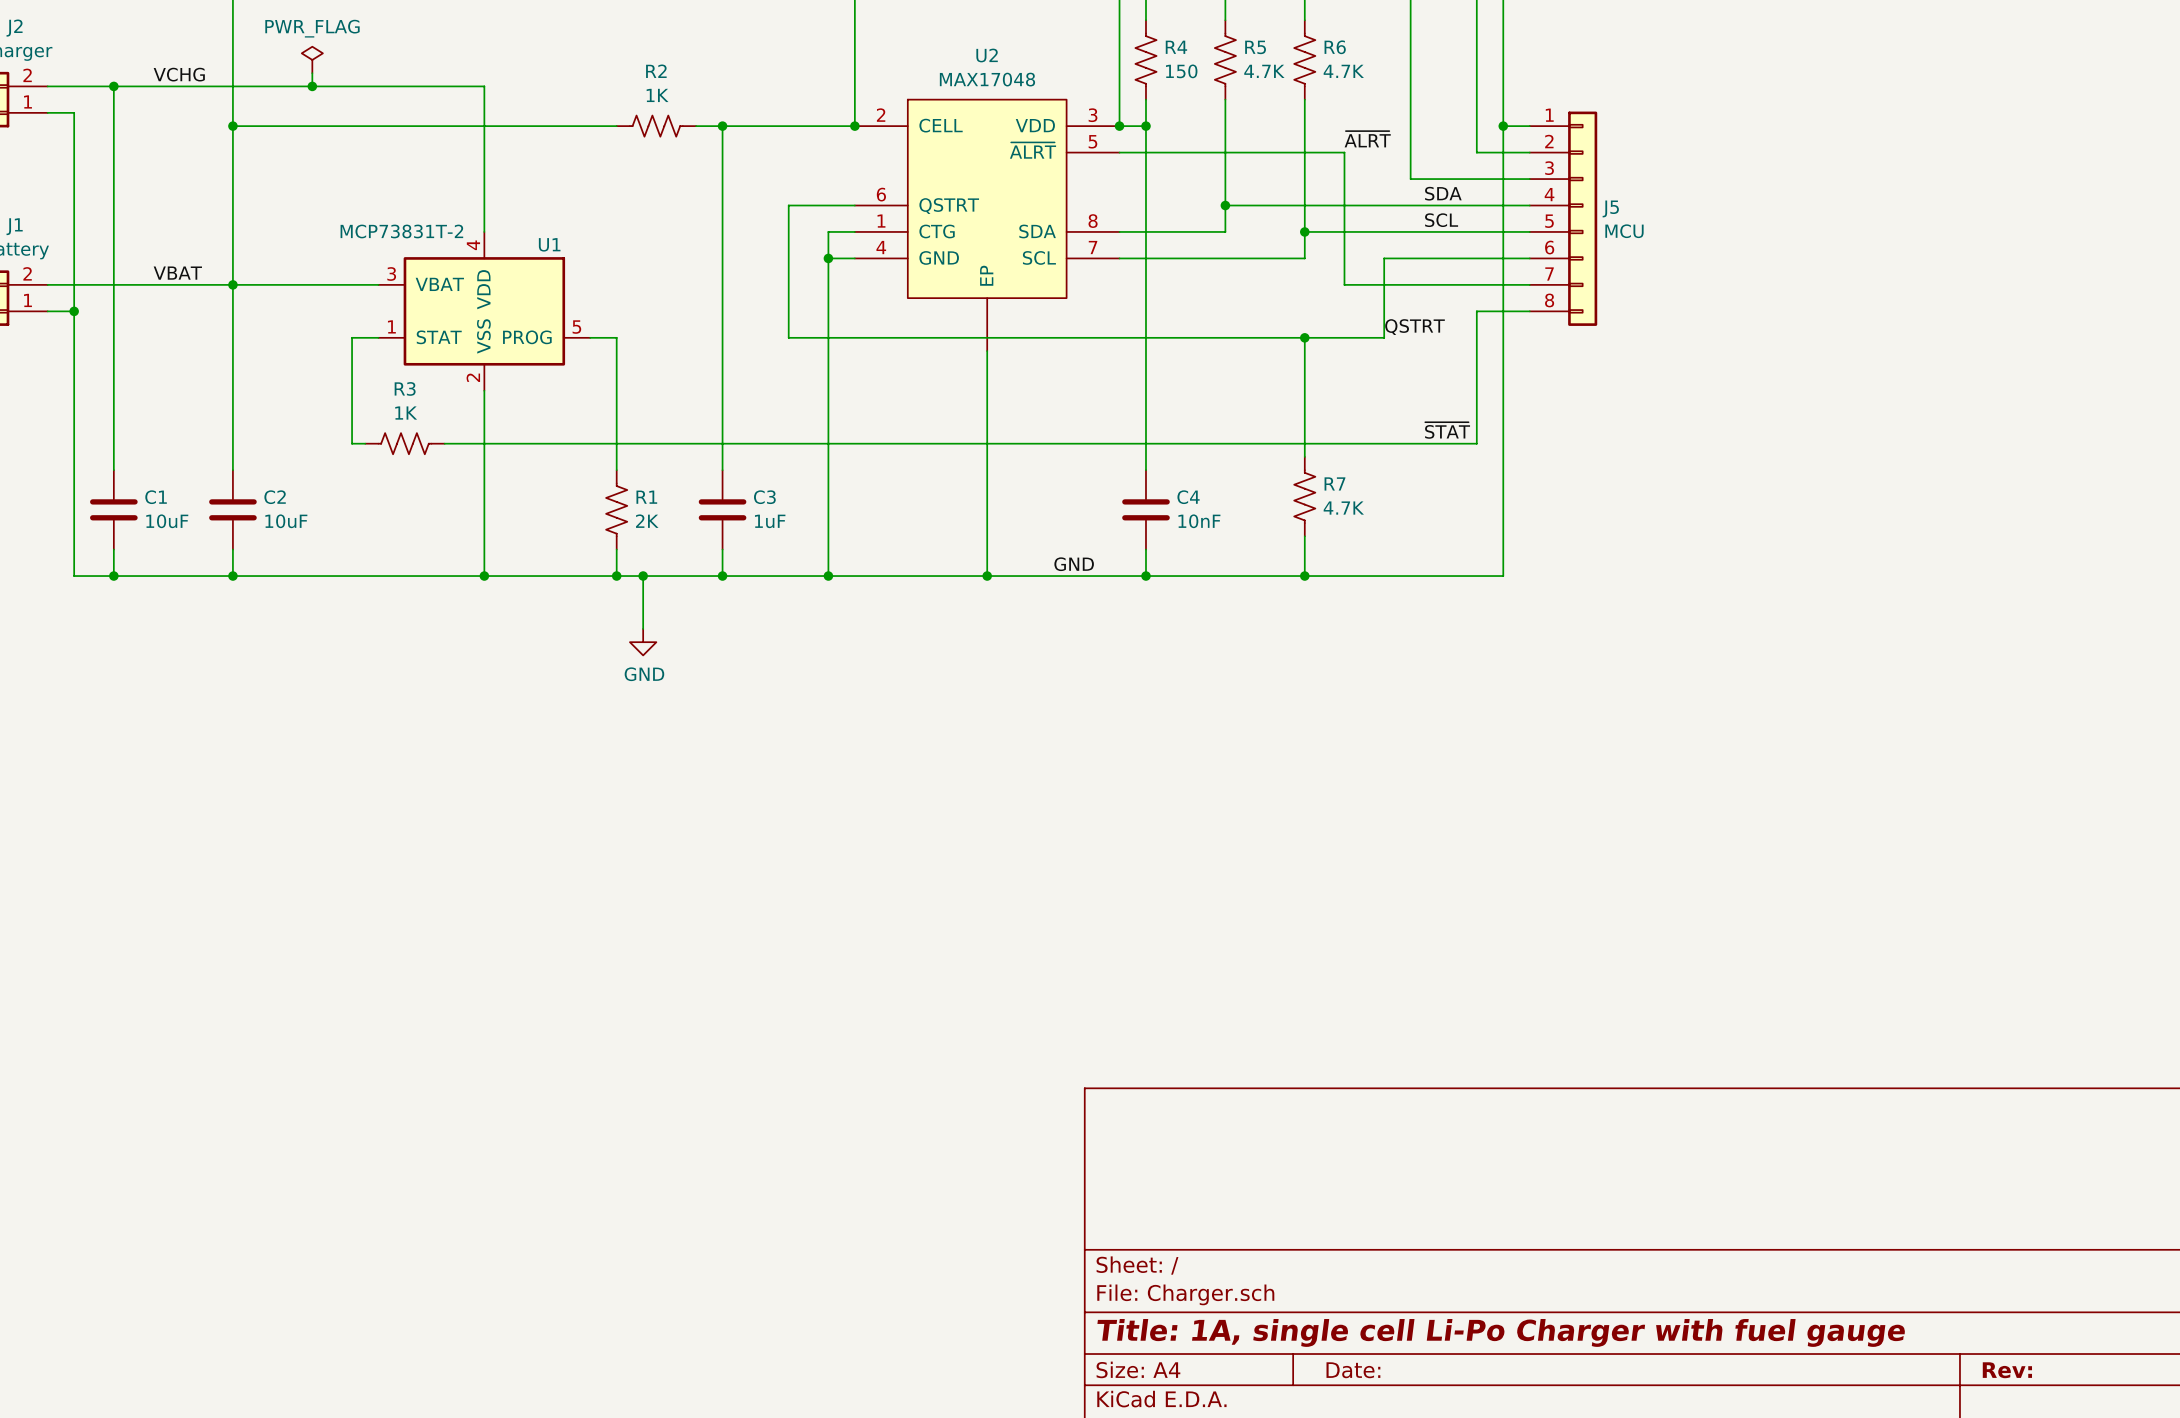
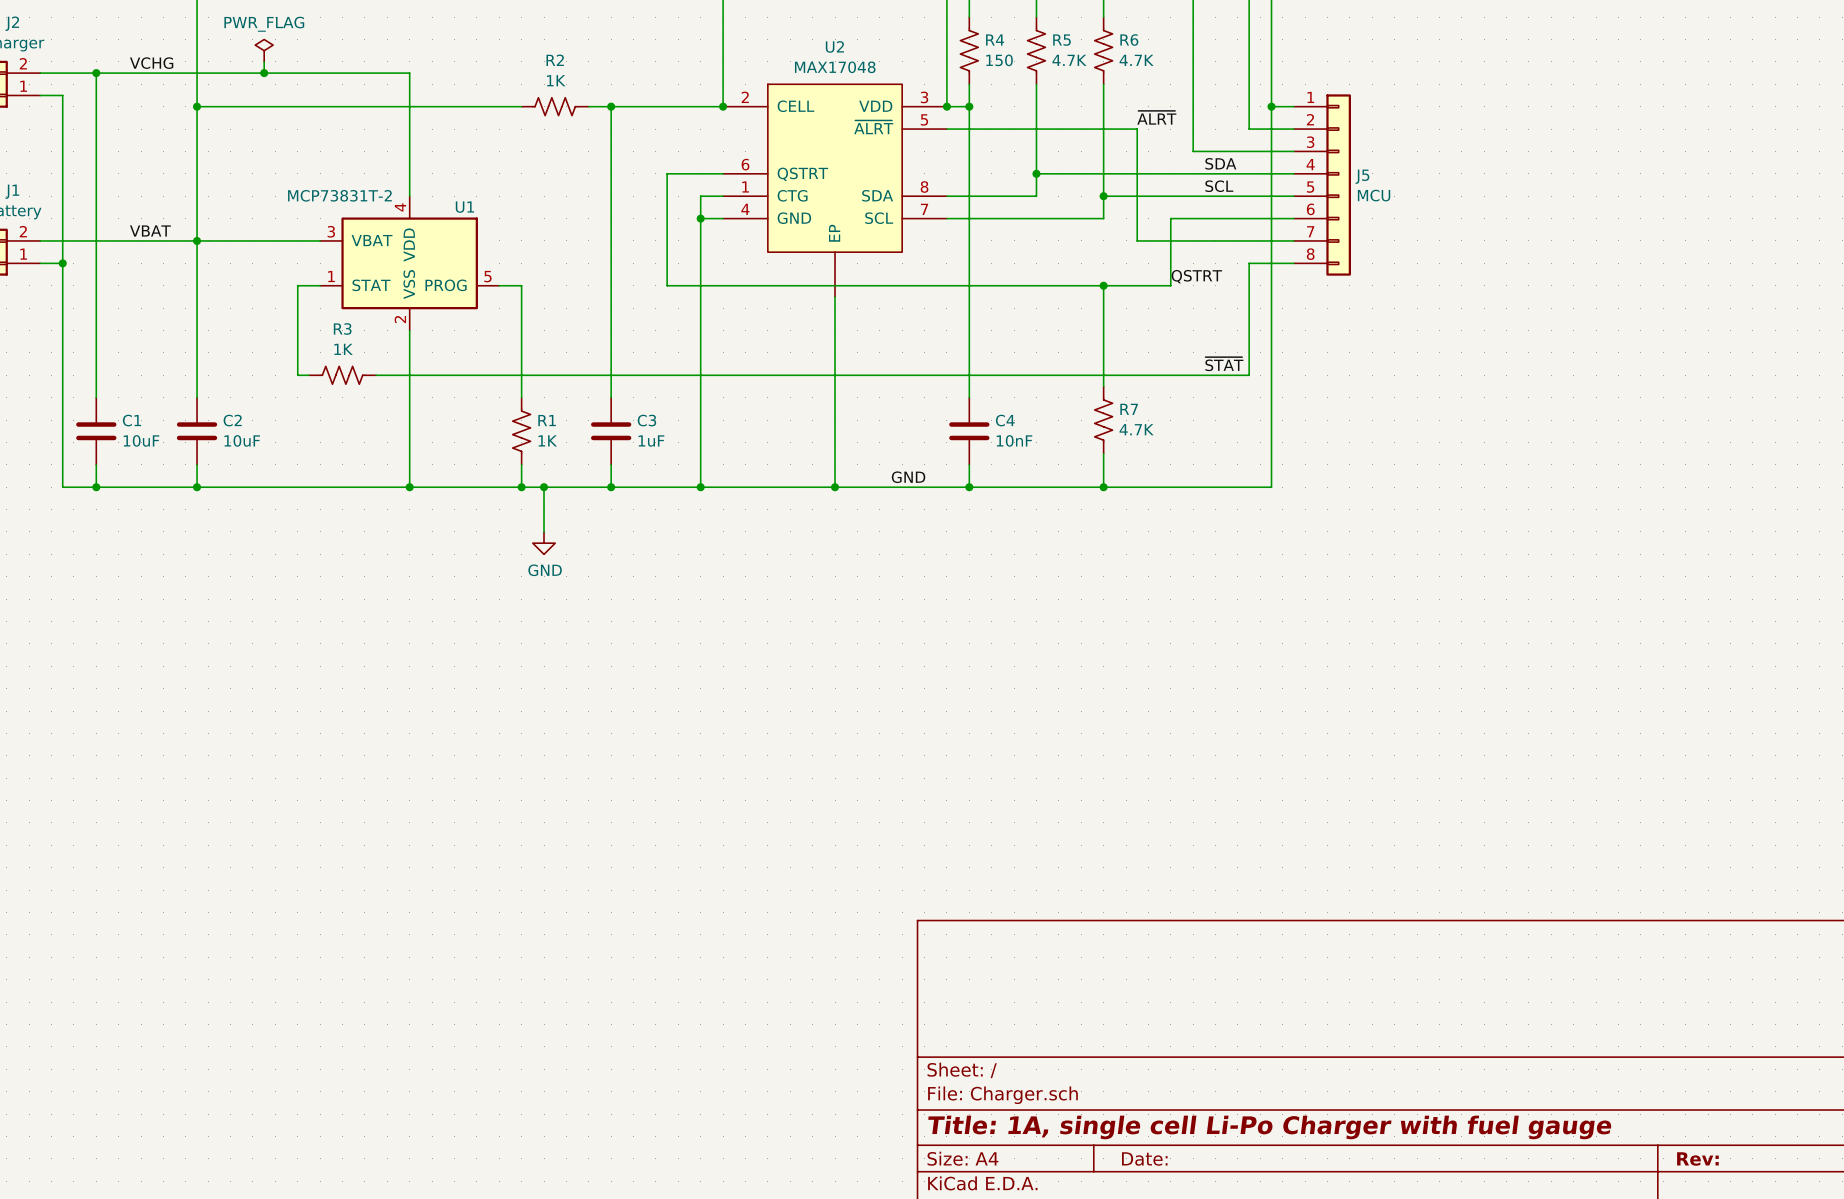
R1 value: 2K (647, 521) -> 1K (547, 440)

